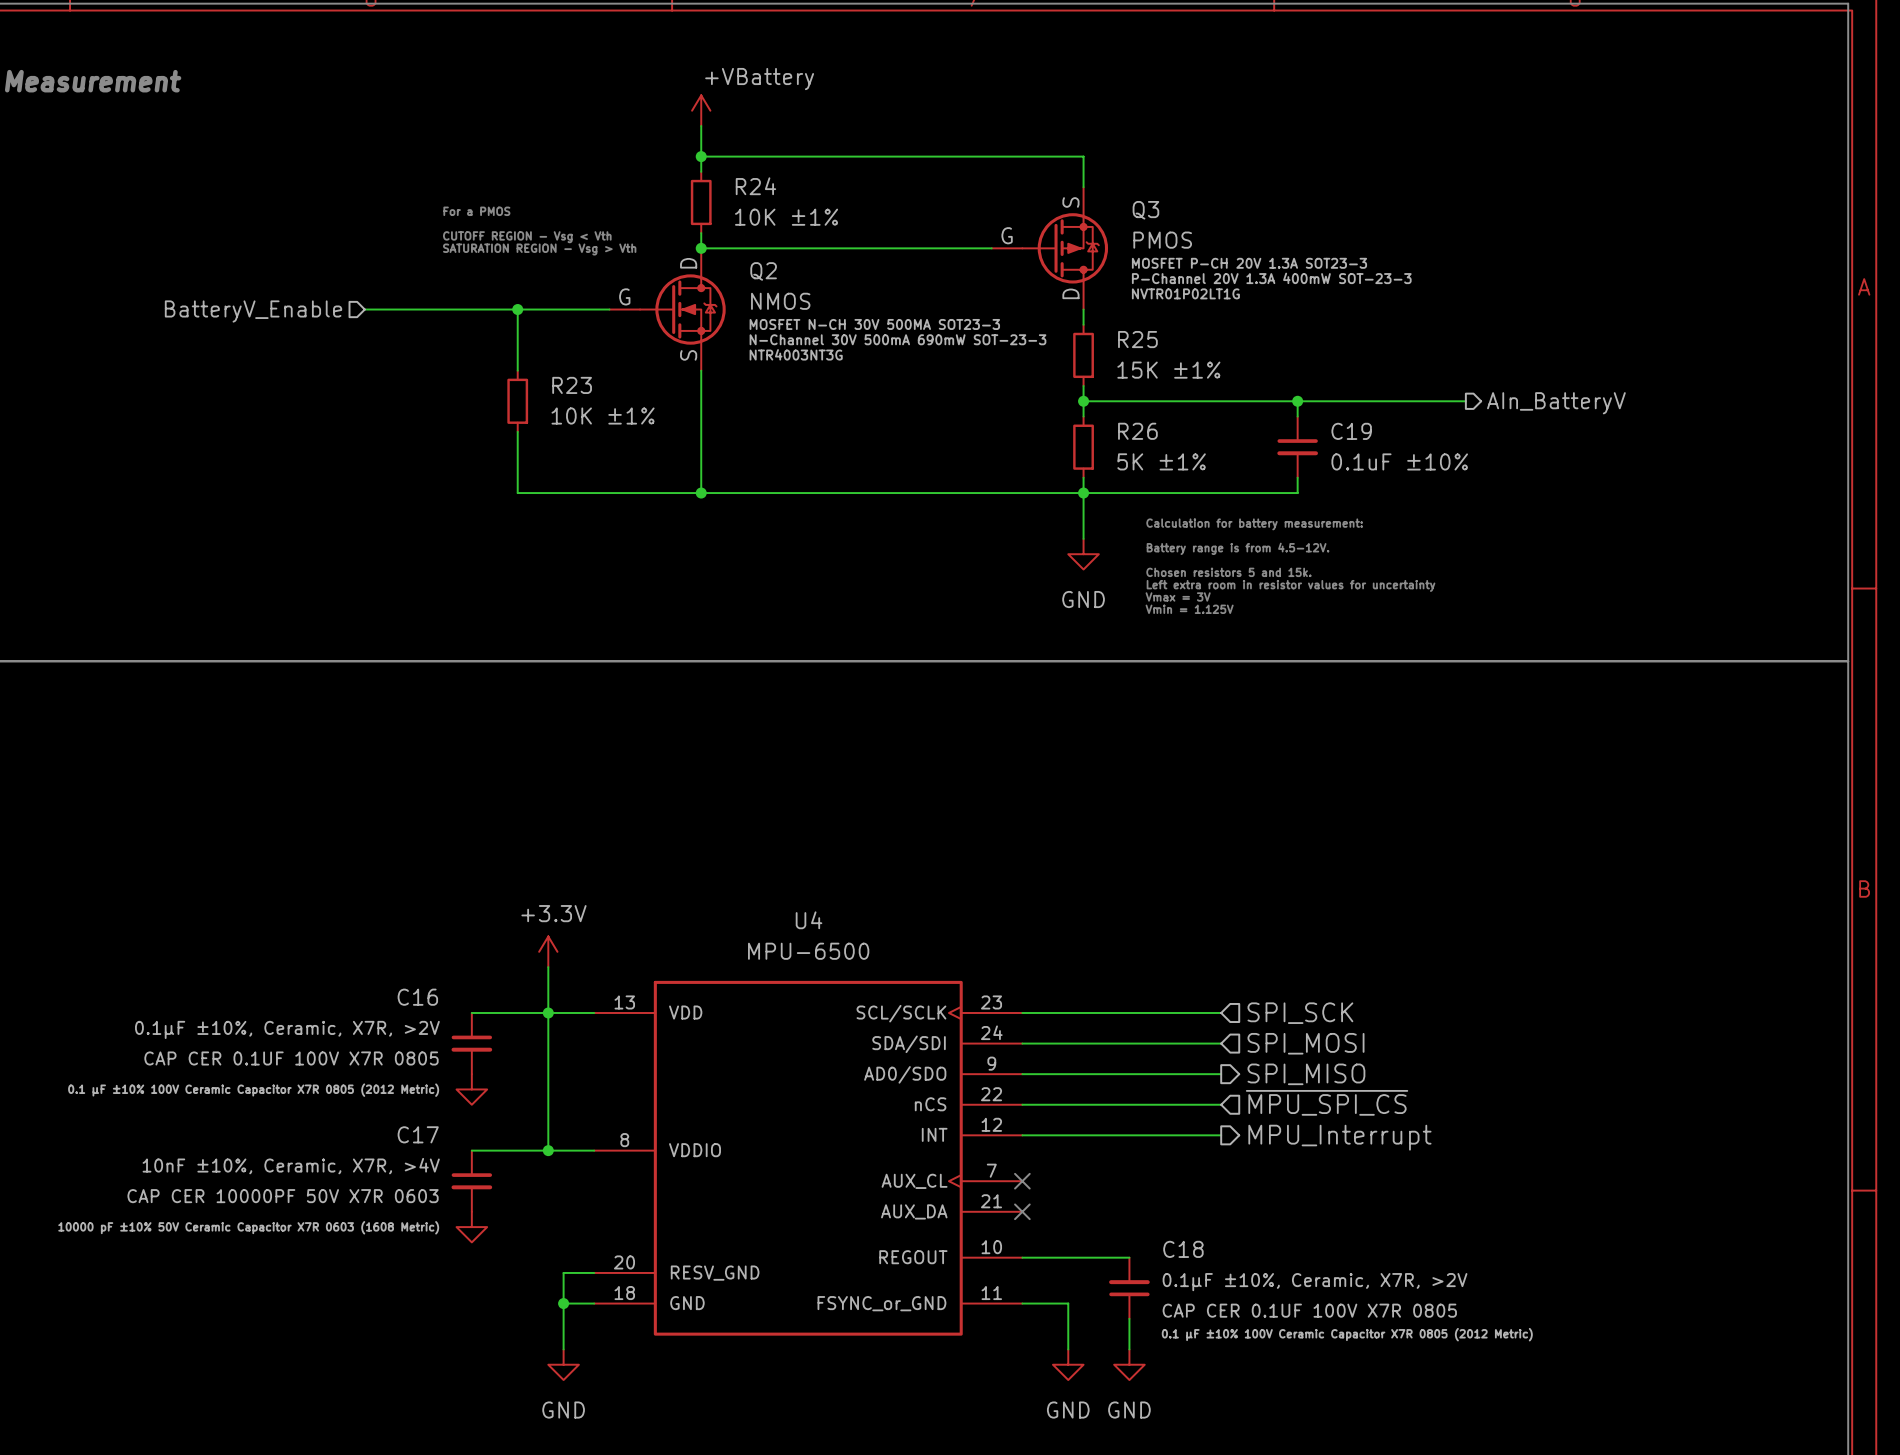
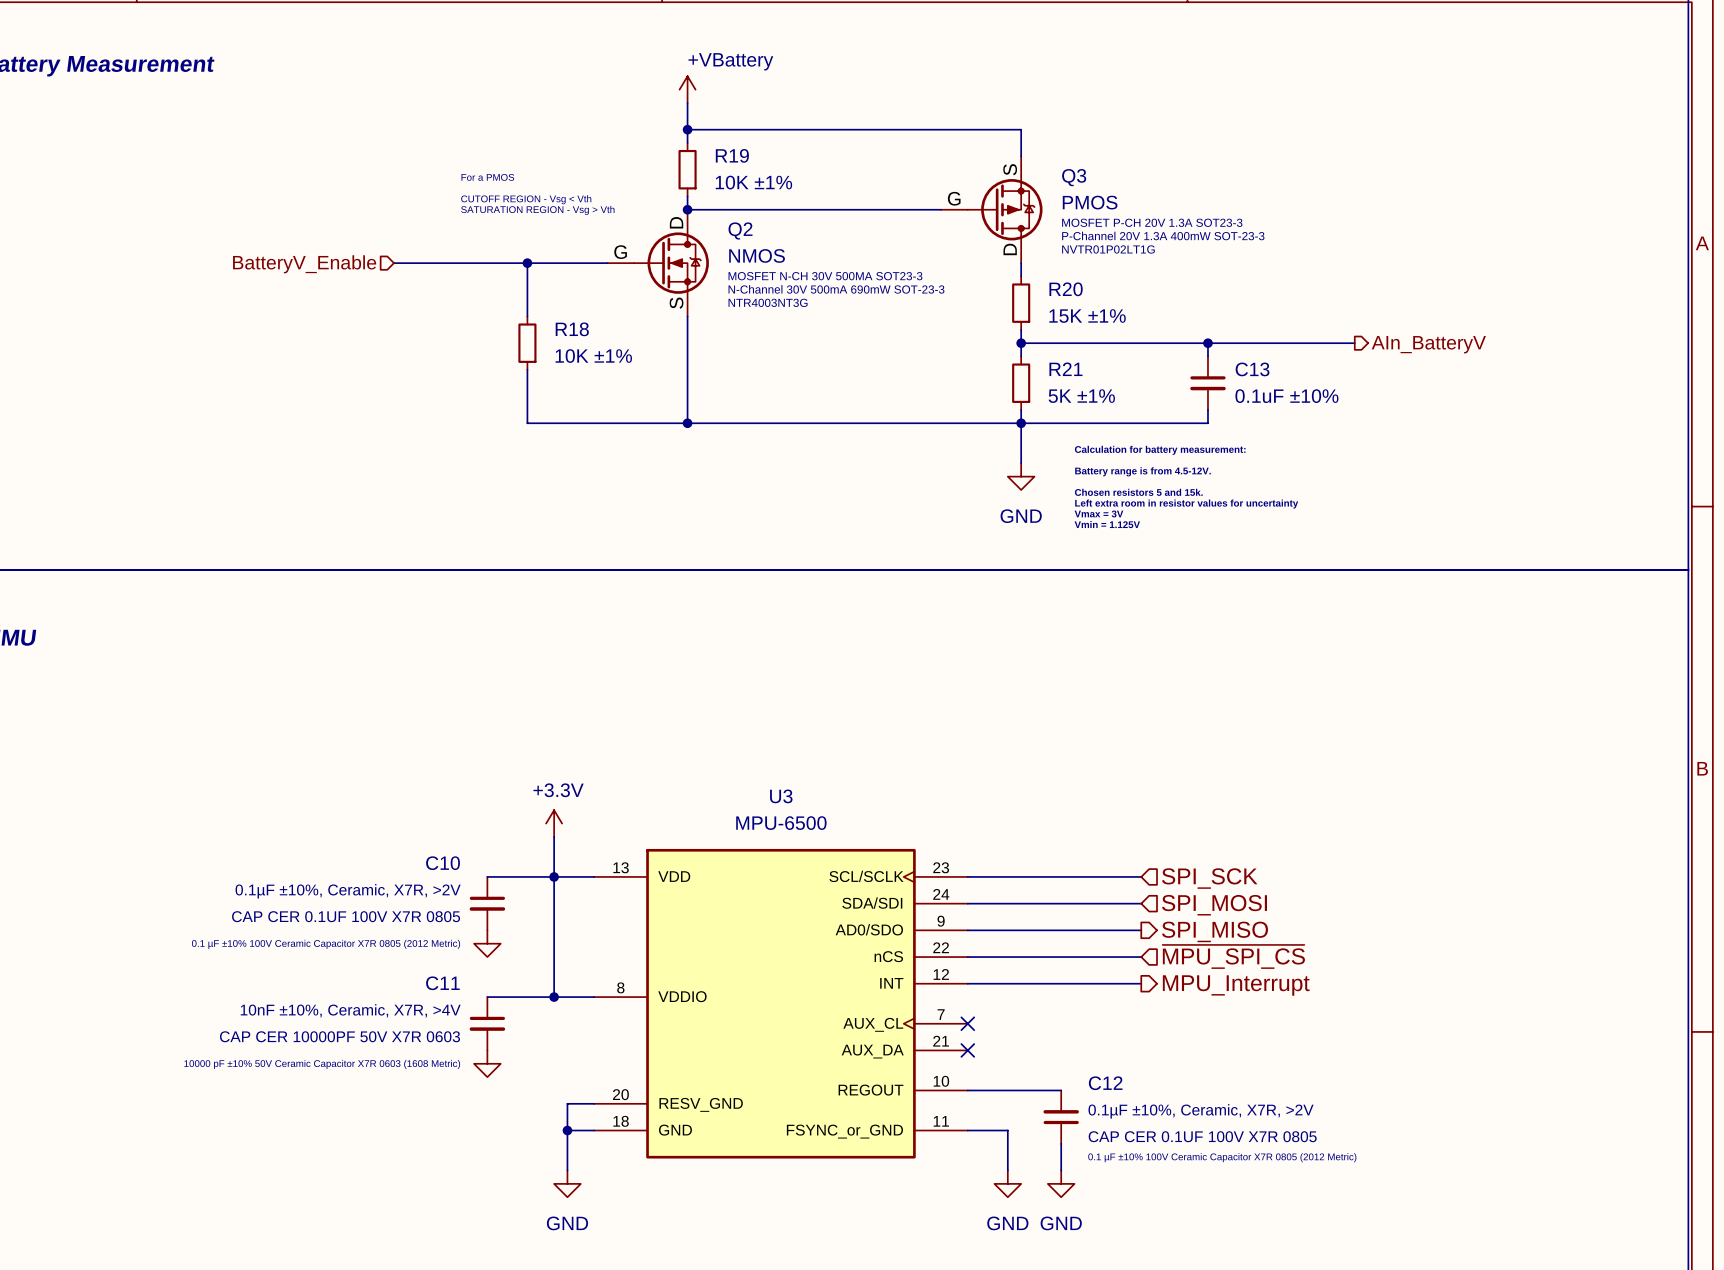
R24 name: R24 (755, 186) -> R19 (732, 155)
R25 name: R25 (1137, 339) -> R20 (1066, 289)
R23 name: R23 (572, 385) -> R18 (572, 329)
R26 name: R26 (1137, 431) -> R21 (1065, 369)
C19 name: C19 (1351, 431) -> C13 (1252, 369)
U4 name: U4 (809, 920) -> U3 (781, 796)
C16 name: C16 (417, 997) -> C10 (443, 863)
C17 name: C17 (418, 1134) -> C11 (442, 983)
C18 name: C18 (1183, 1249) -> C12 (1105, 1083)

